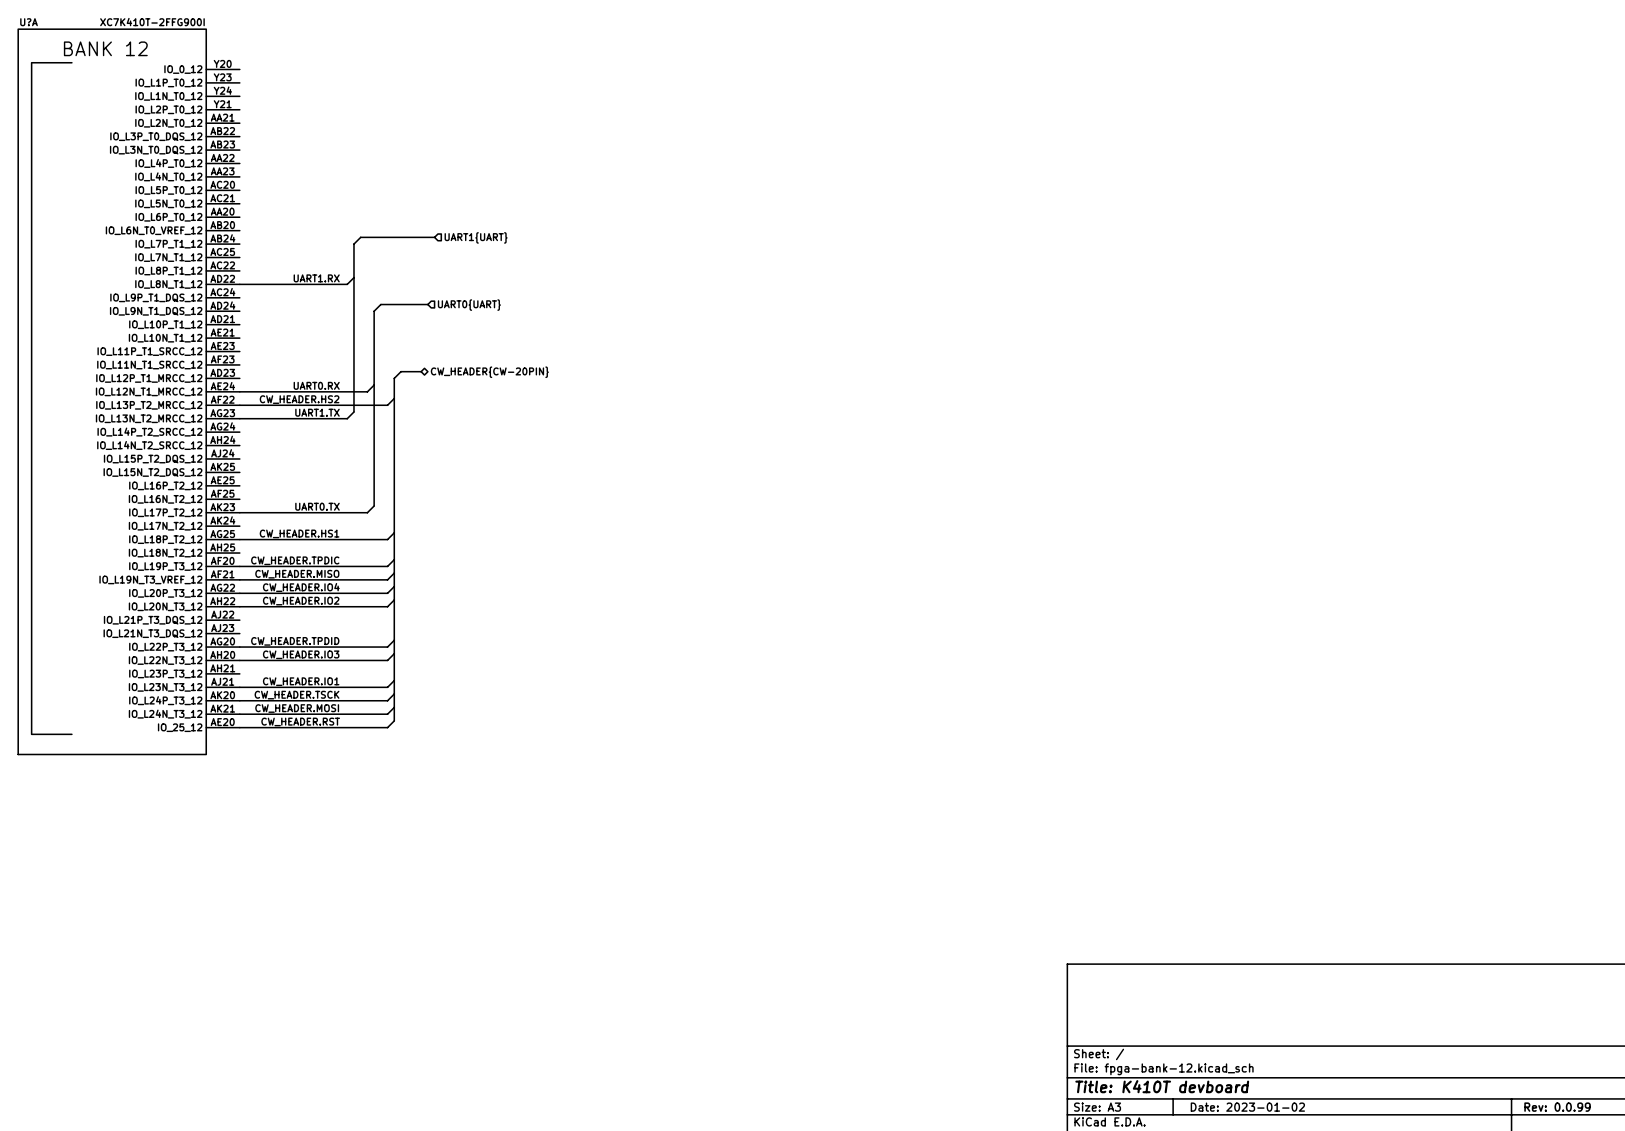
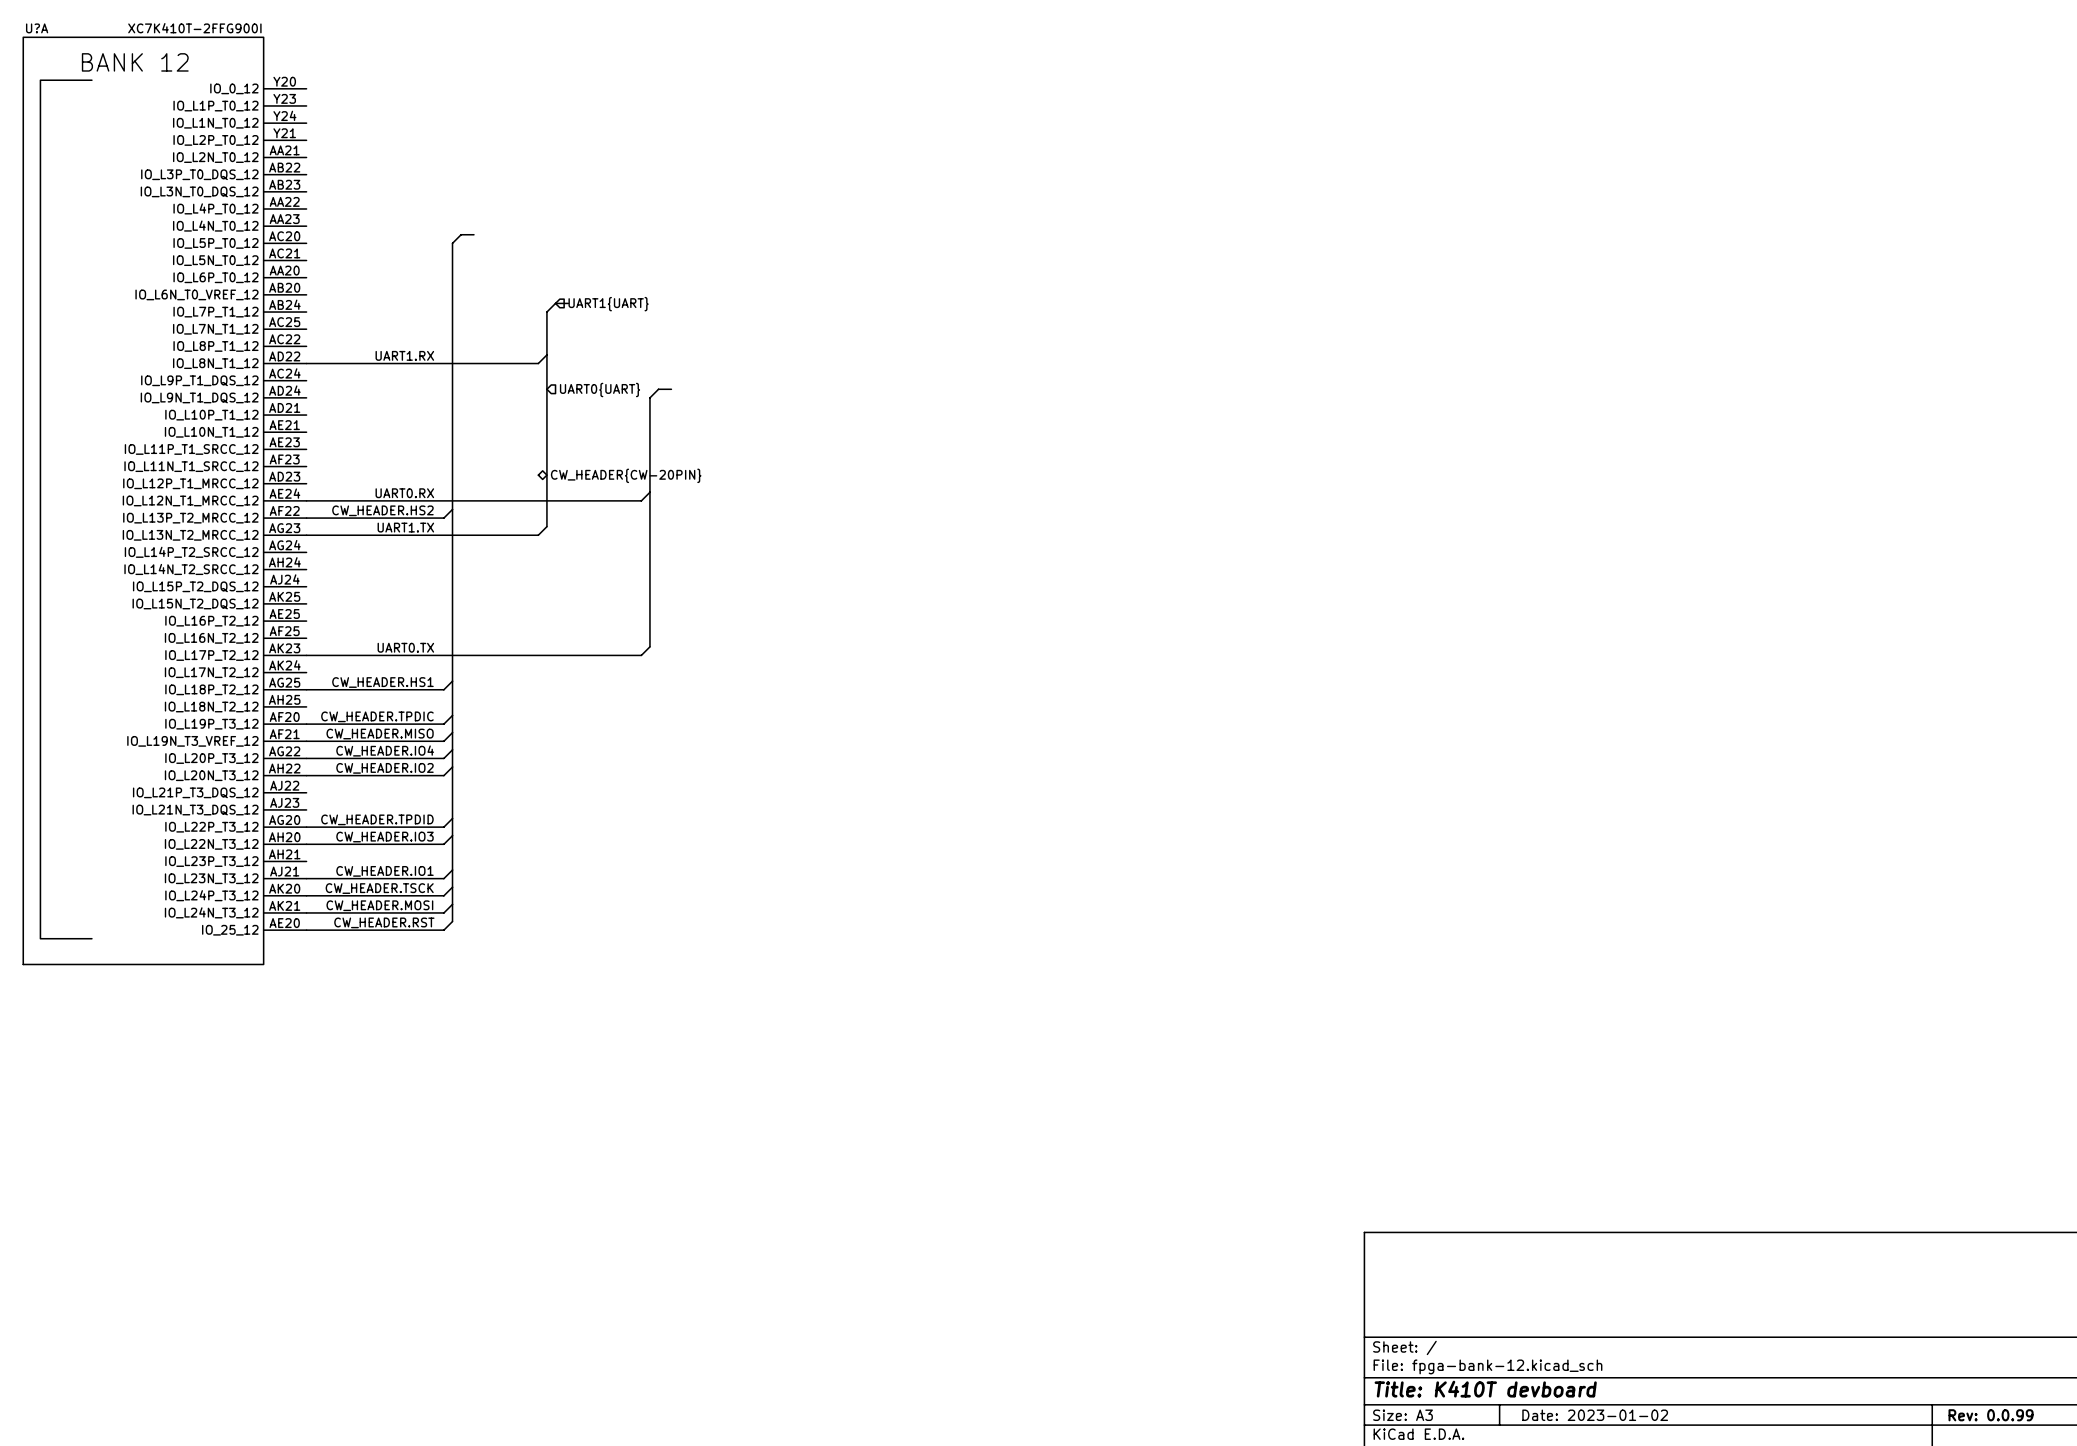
bus: (434, 237) (360, 237) (353, 244) -> (473, 234) (461, 234) (452, 243) (452, 312)
bus: none -> (568, 303) (555, 303) (546, 312) (546, 526)
wire: (353, 277) (347, 284) -> (546, 354) (538, 363) (443, 363)
bus: (427, 304) (380, 304) (374, 311) (374, 506) -> none
bus: none -> (671, 389) (658, 389) (649, 397) (649, 646)
bus: (421, 371) (401, 371) (394, 378) (394, 720) -> none
wire: (374, 385) (367, 391) -> (649, 492) (641, 500) (469, 500)
wire: (394, 398) (387, 405) (347, 405) -> (452, 509) (443, 518)
wire: (353, 411) (347, 418) -> (546, 526) (538, 535) (443, 535)
bus: none -> (452, 526) (452, 921)
wire: (374, 506) (367, 512) -> (649, 646) (641, 655) (469, 655)
wire: (394, 532) (387, 539) (347, 539) -> (452, 681) (443, 689)
wire: (394, 559) (387, 566) (347, 566) -> (452, 715) (443, 724)
wire: (394, 573) (387, 579) (347, 579) -> (452, 732) (443, 741)
wire: (394, 586) (387, 593) (347, 593) -> (452, 749) (443, 758)
wire: (394, 600) (387, 606) (347, 606) -> (452, 767) (443, 775)
wire: (394, 640) (387, 647) (347, 647) -> (452, 818) (443, 827)
wire: (394, 653) (387, 660) (347, 660) -> (452, 835) (443, 844)
wire: (394, 680) (387, 687) (347, 687) -> (452, 870) (443, 878)
wire: (394, 694) (387, 700) (347, 700) -> (452, 887) (443, 895)
wire: (394, 707) (387, 714) (347, 714) -> (452, 904) (443, 912)
wire: (394, 720) (387, 727) (347, 727) -> (452, 921) (443, 930)

